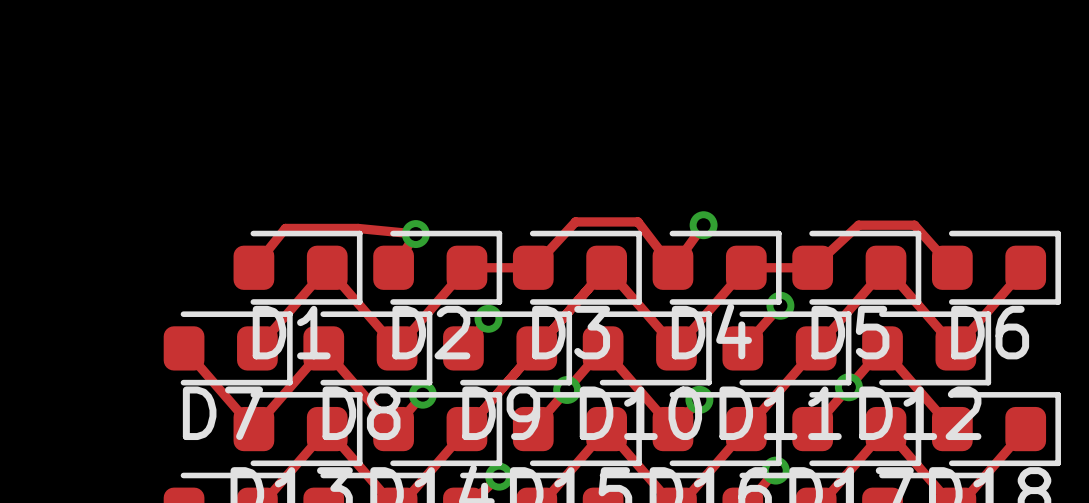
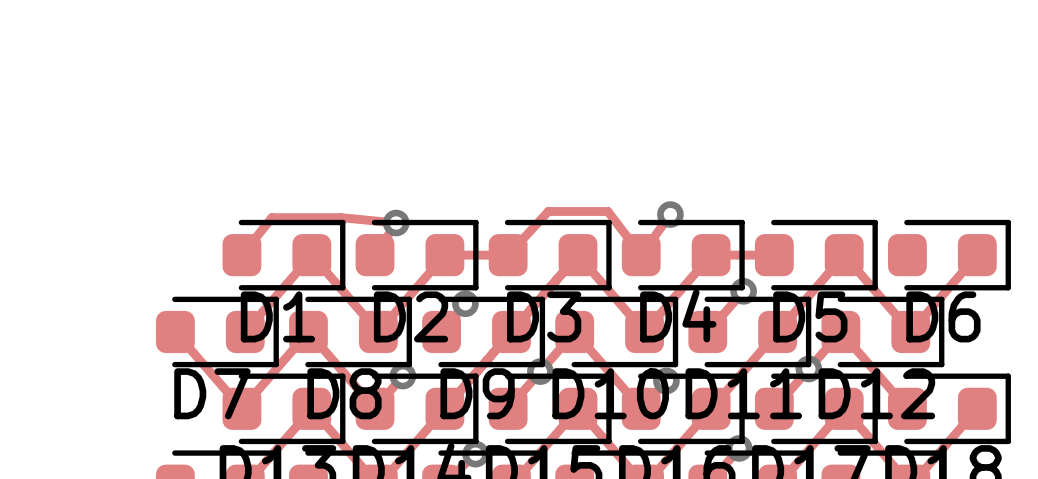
track: (812, 267) (858, 225) (914, 225) (952, 267) -> none

